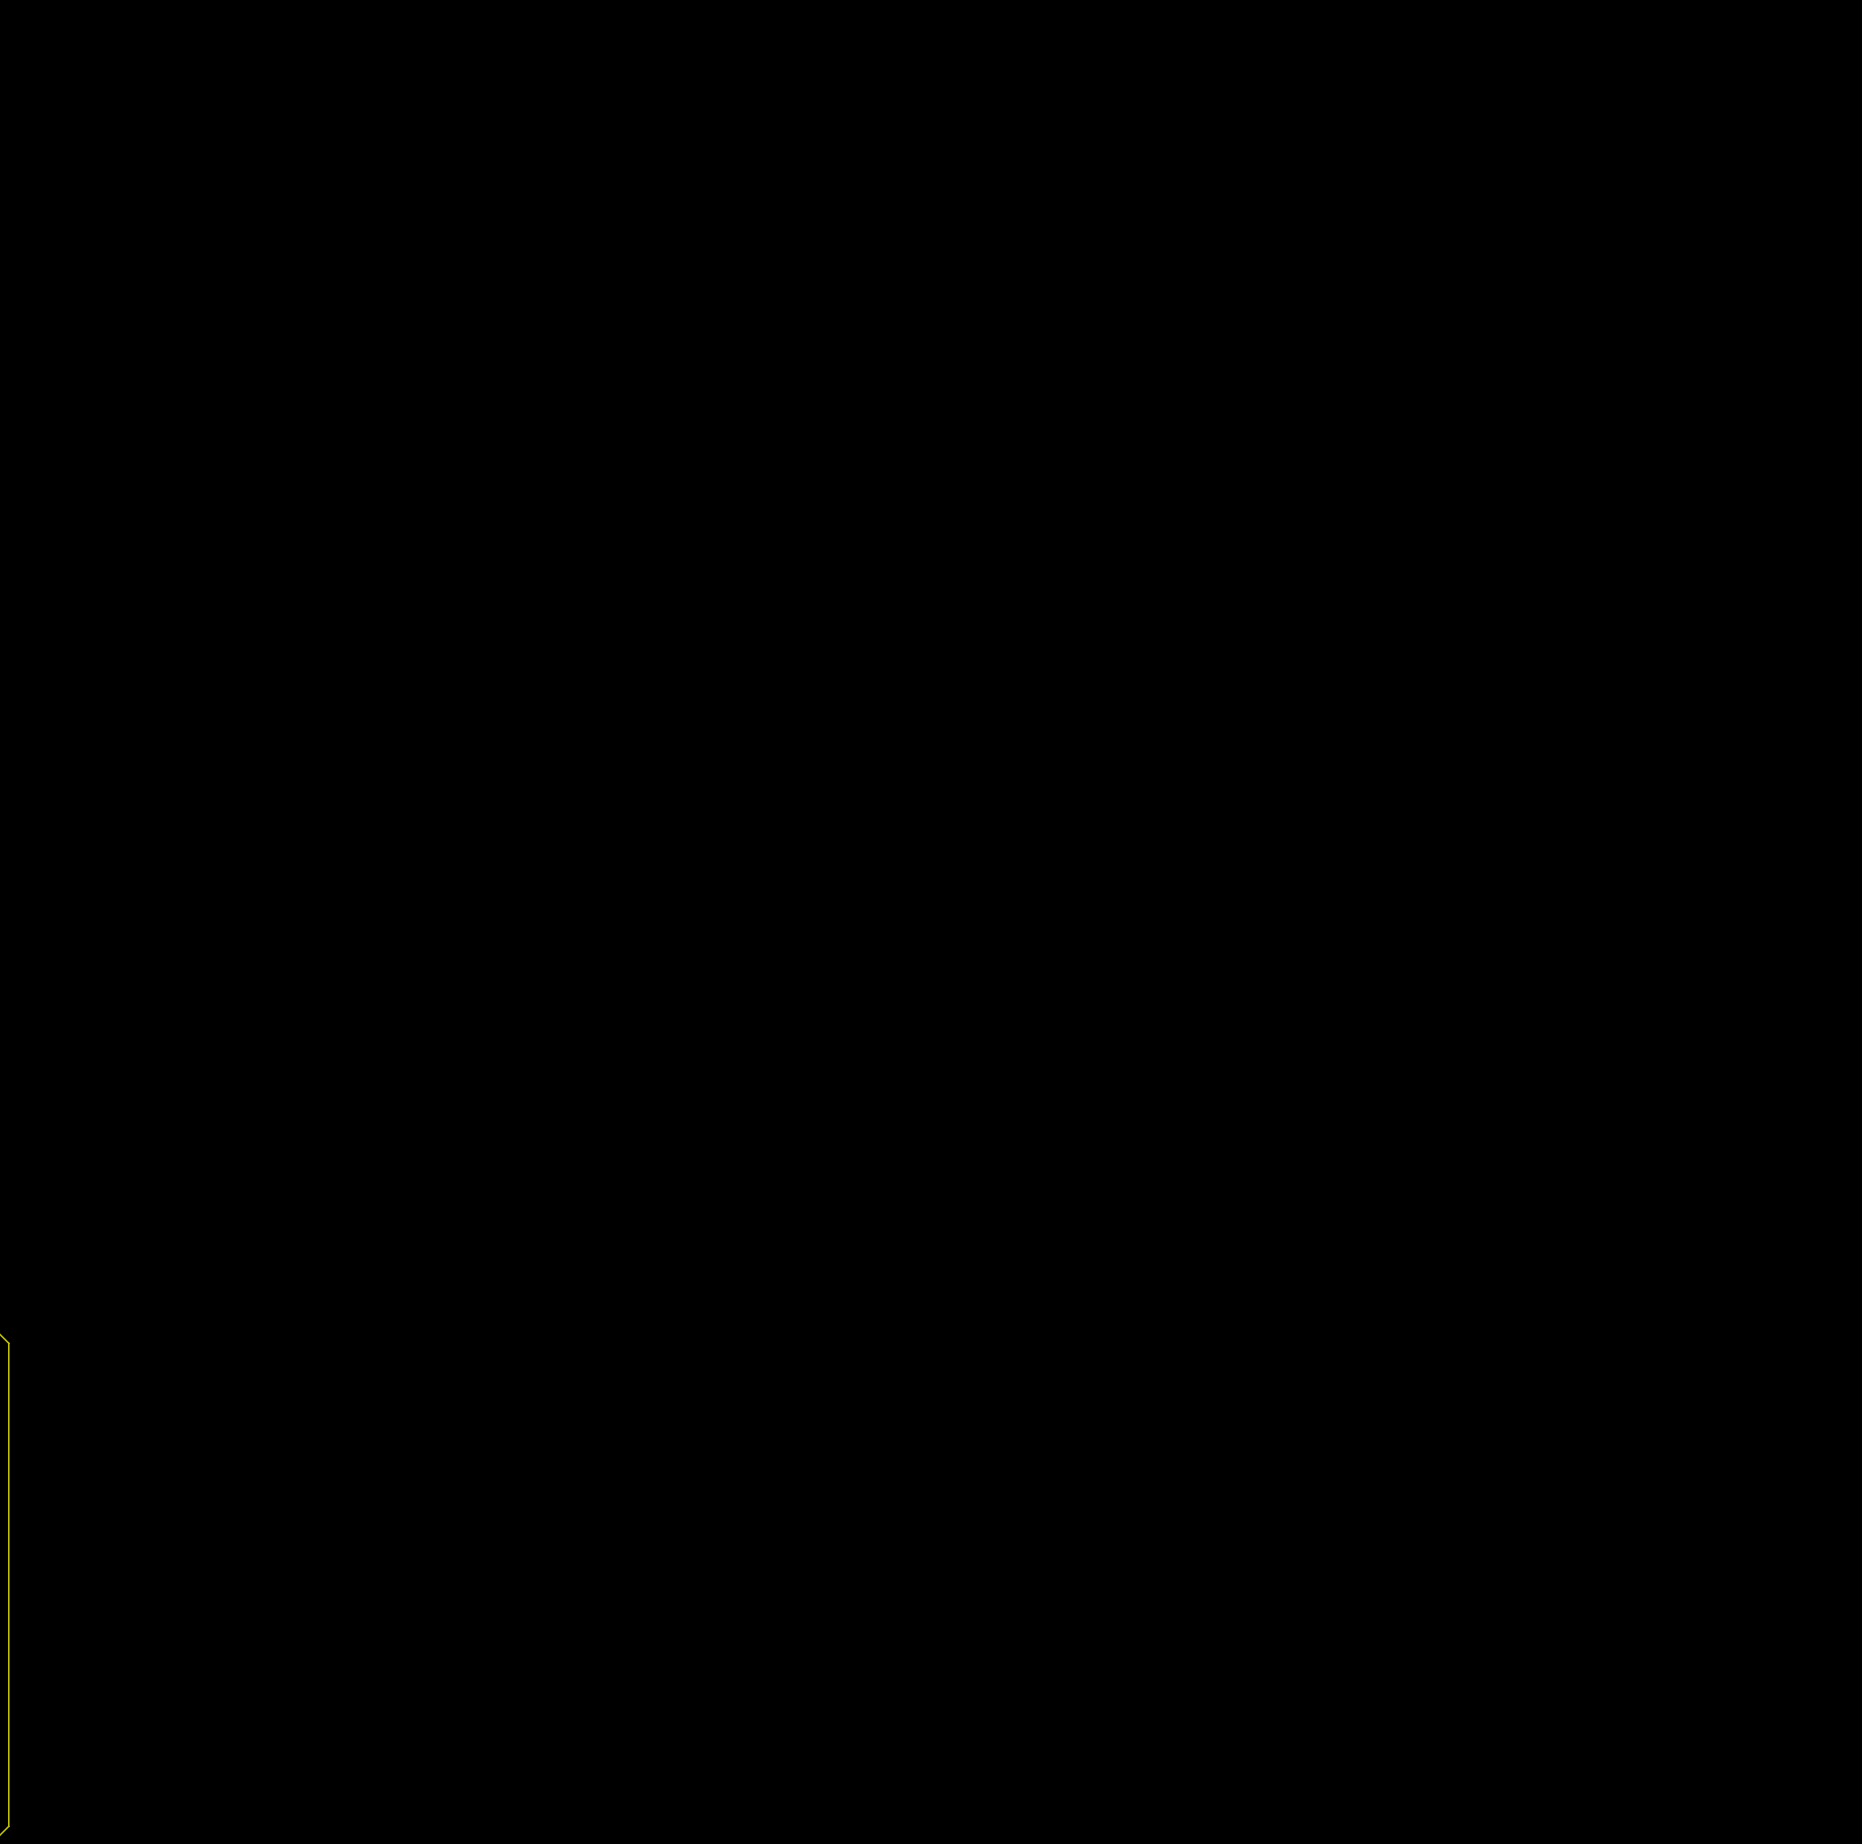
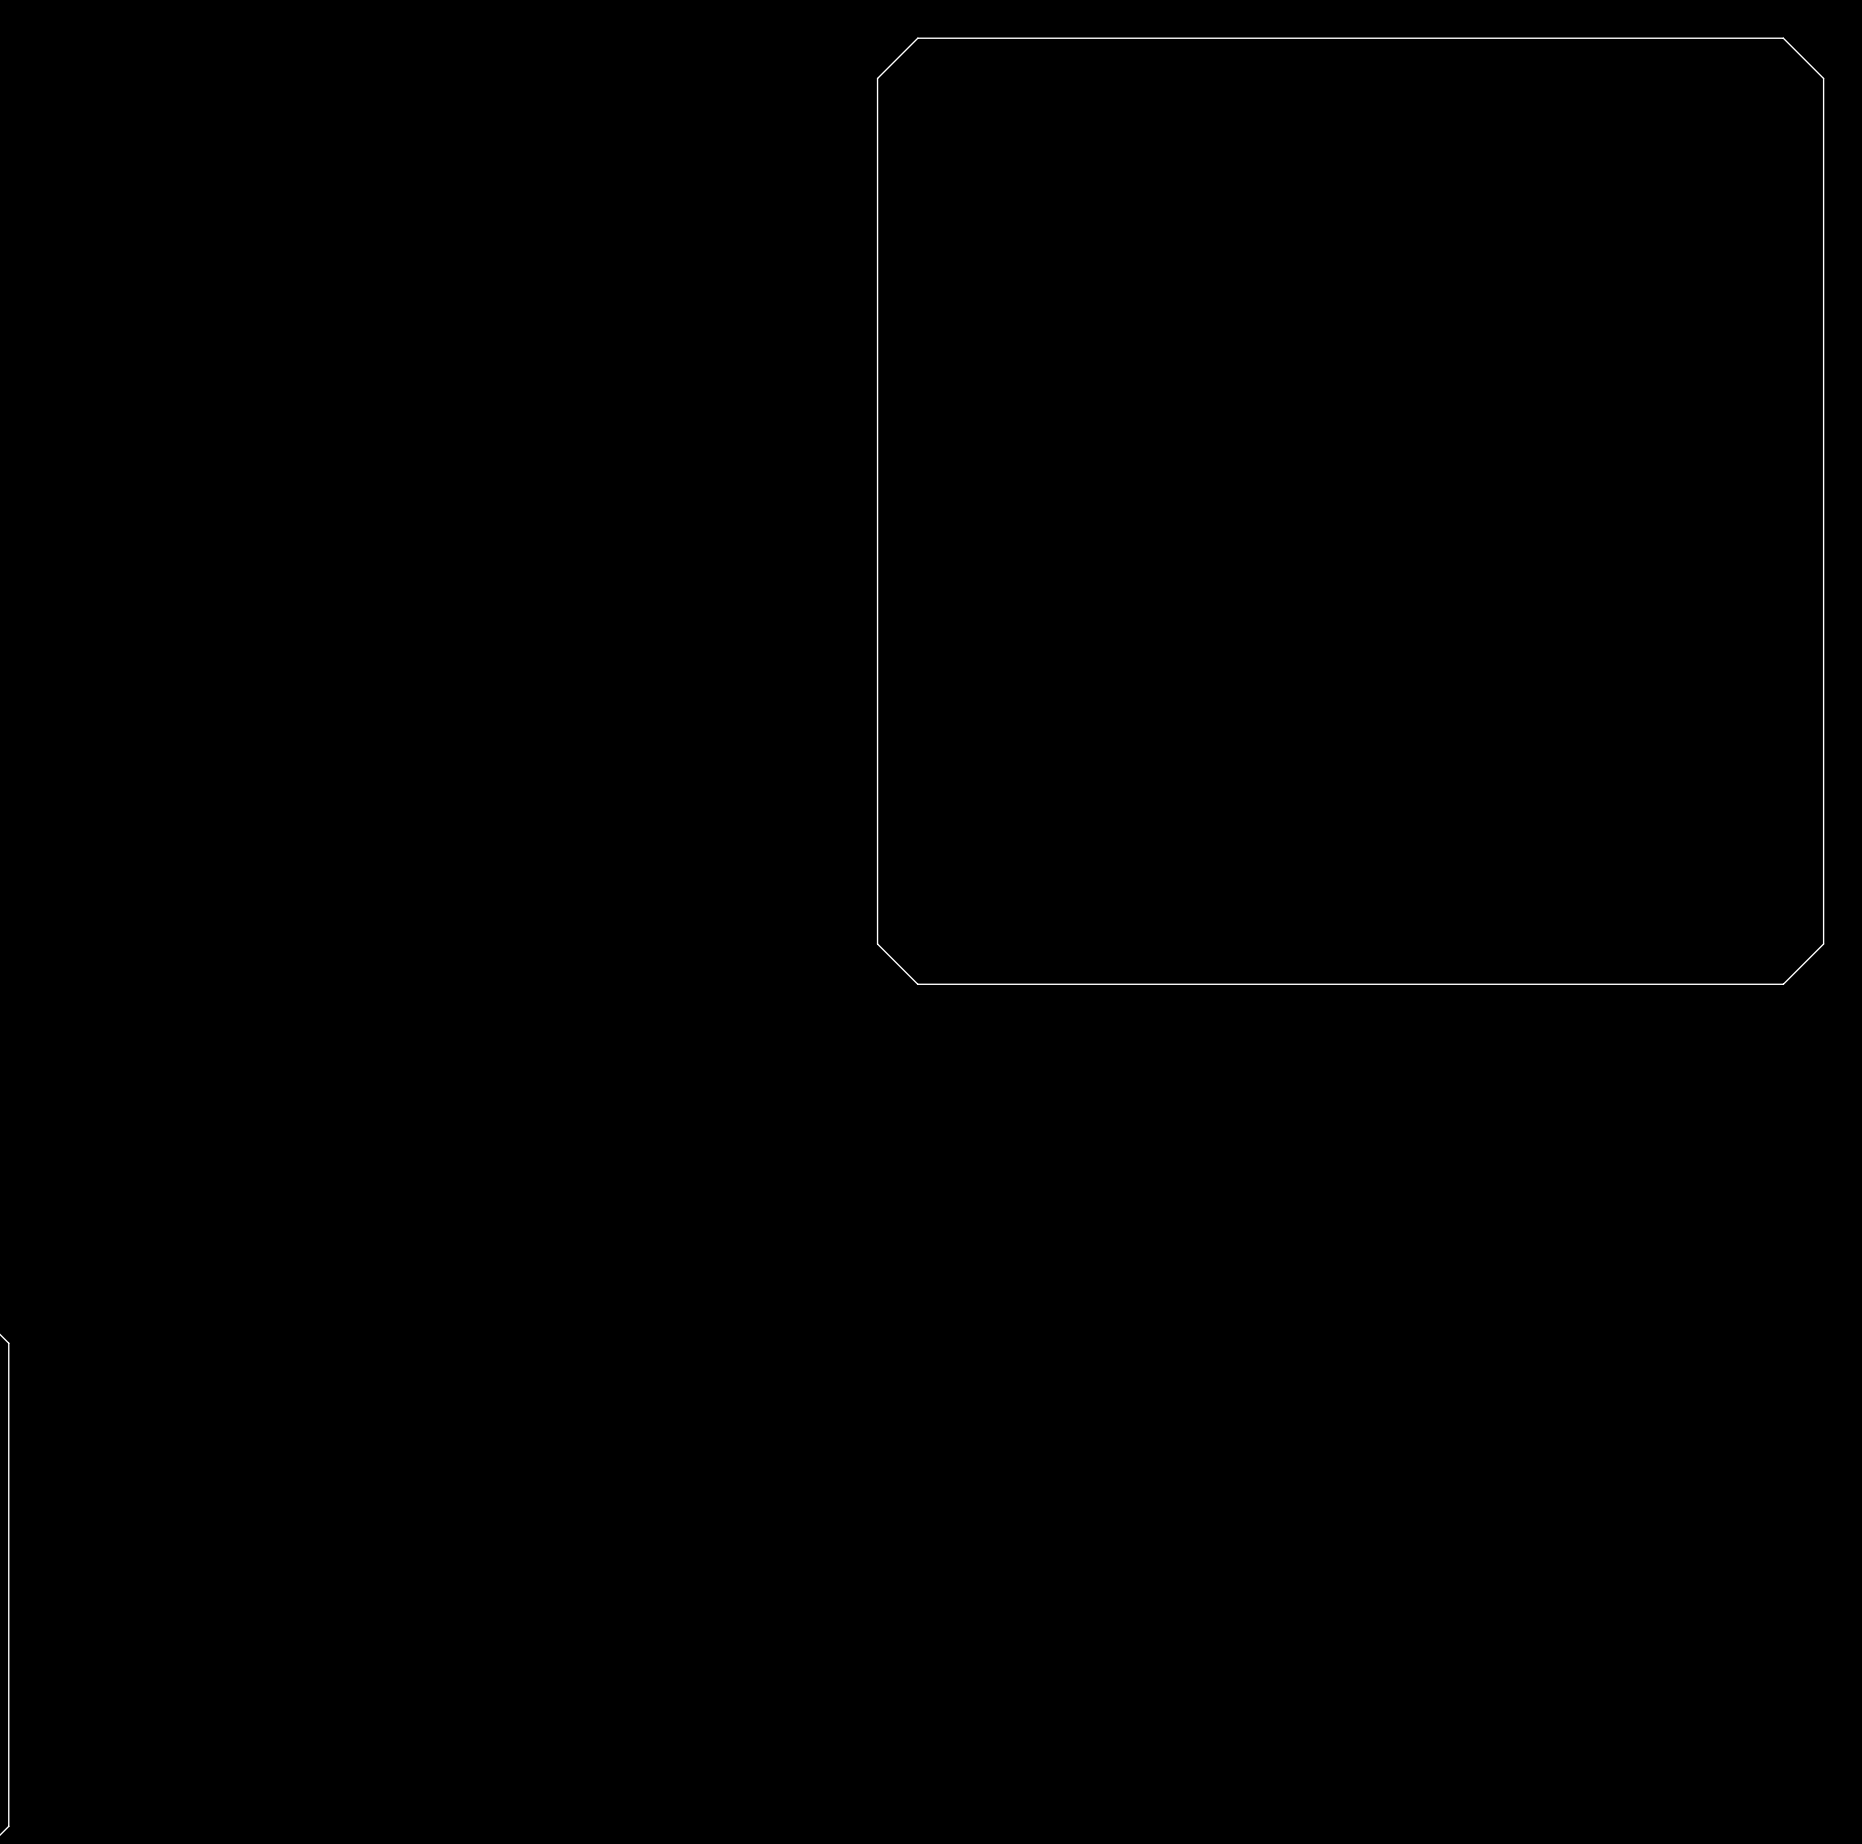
board edge: none -> (1783, 38) (1823, 78) (1823, 944) (1783, 984) (917, 984) (877, 944) (877, 78) (917, 38) (1783, 38)

